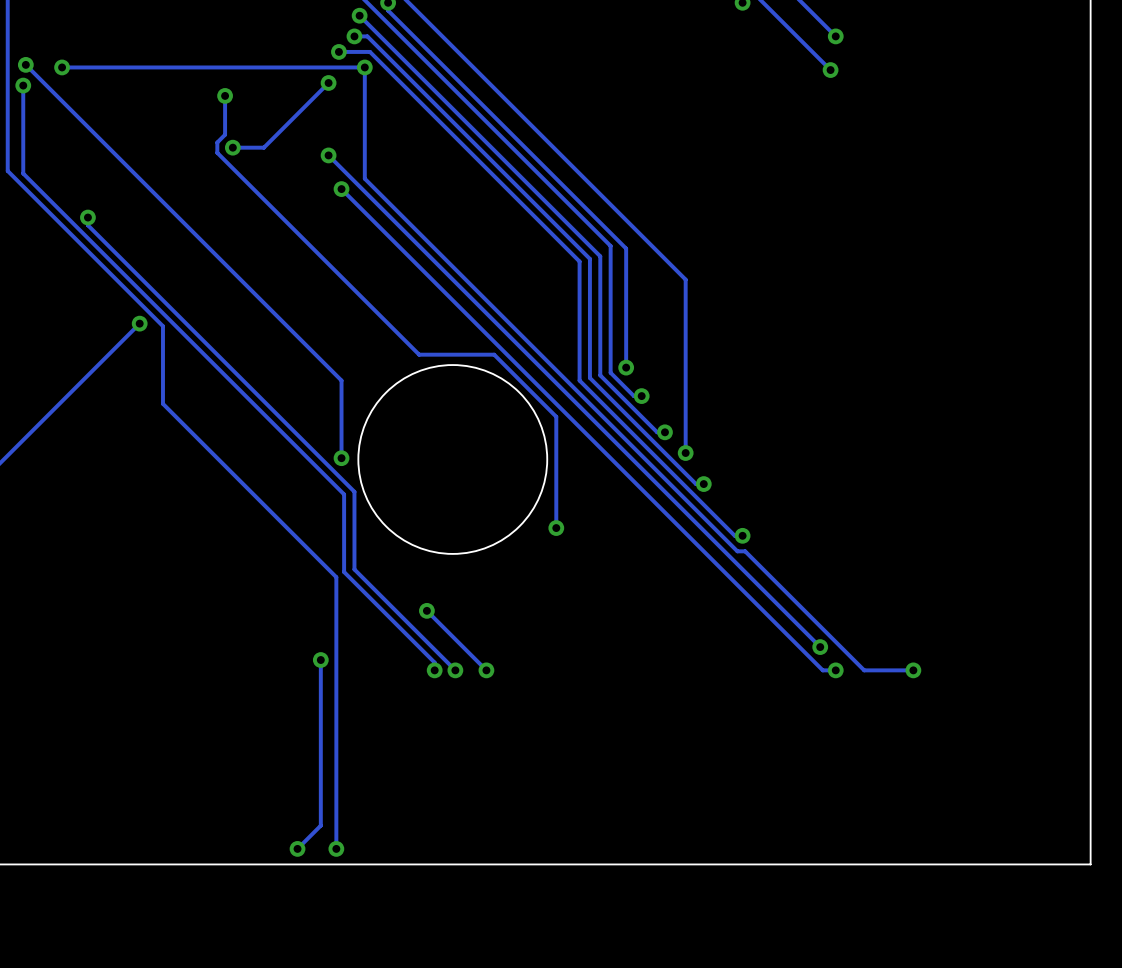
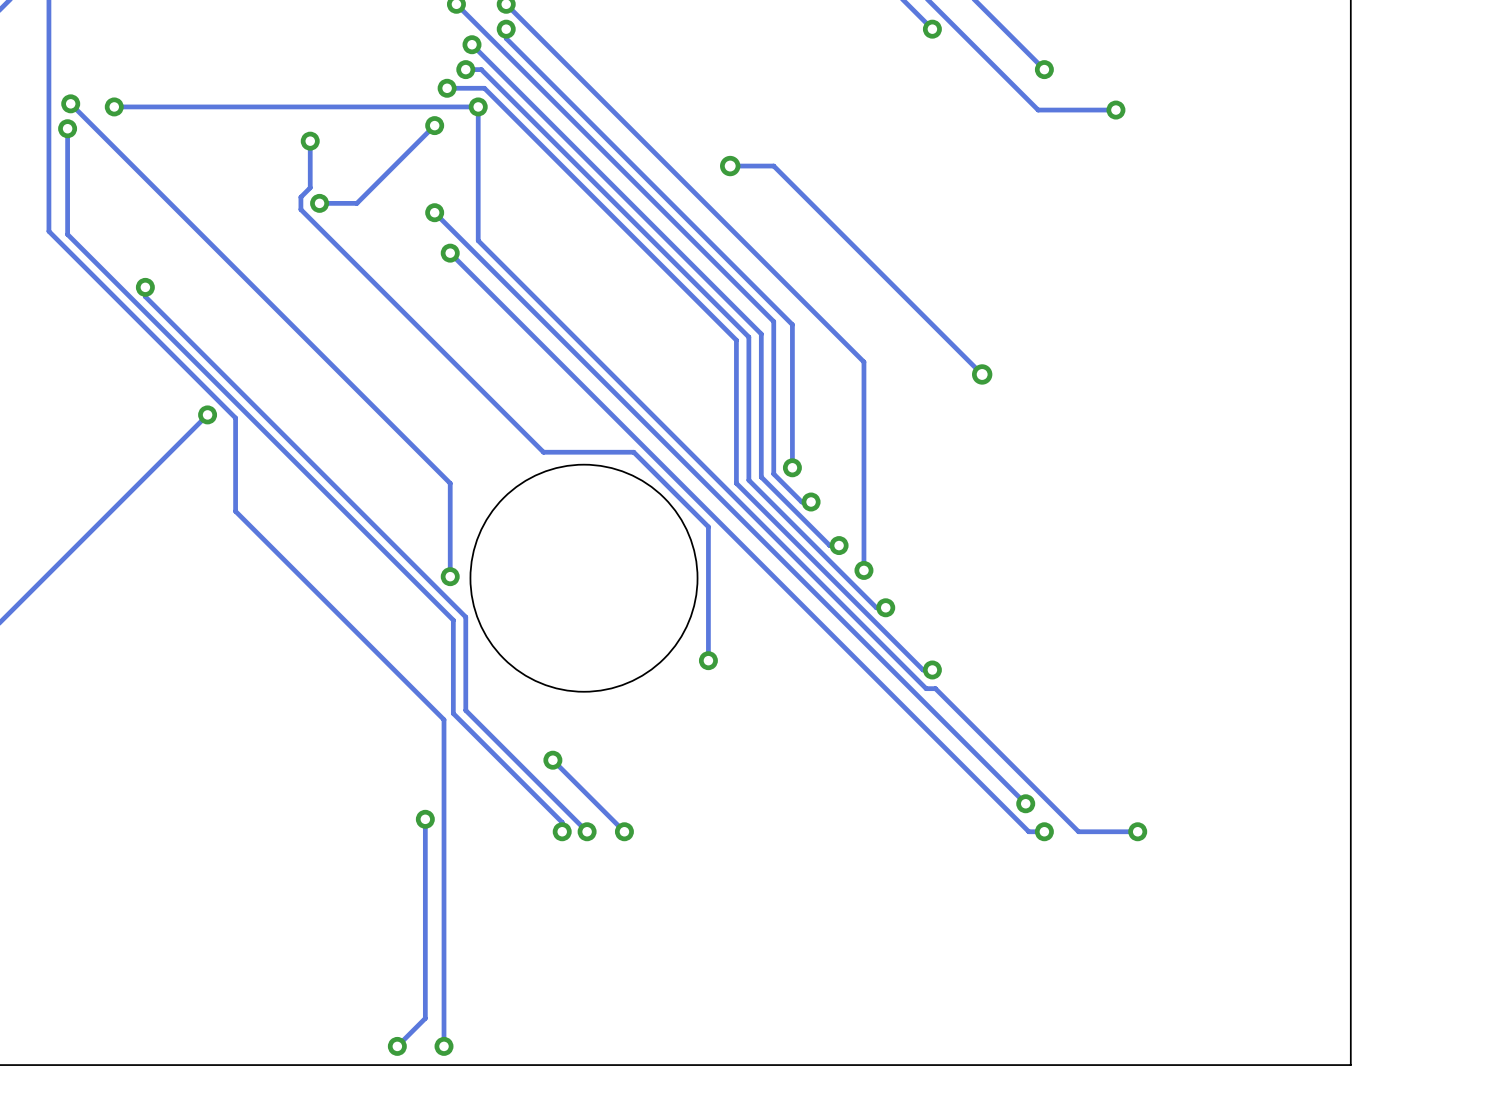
via: (830, 70) -> none
track: none -> (1115, 110) (1038, 110)
via: none -> (1115, 110)
track: none -> (730, 166) (773, 166) (982, 374)
via: none -> (730, 166)
via: none -> (982, 374)

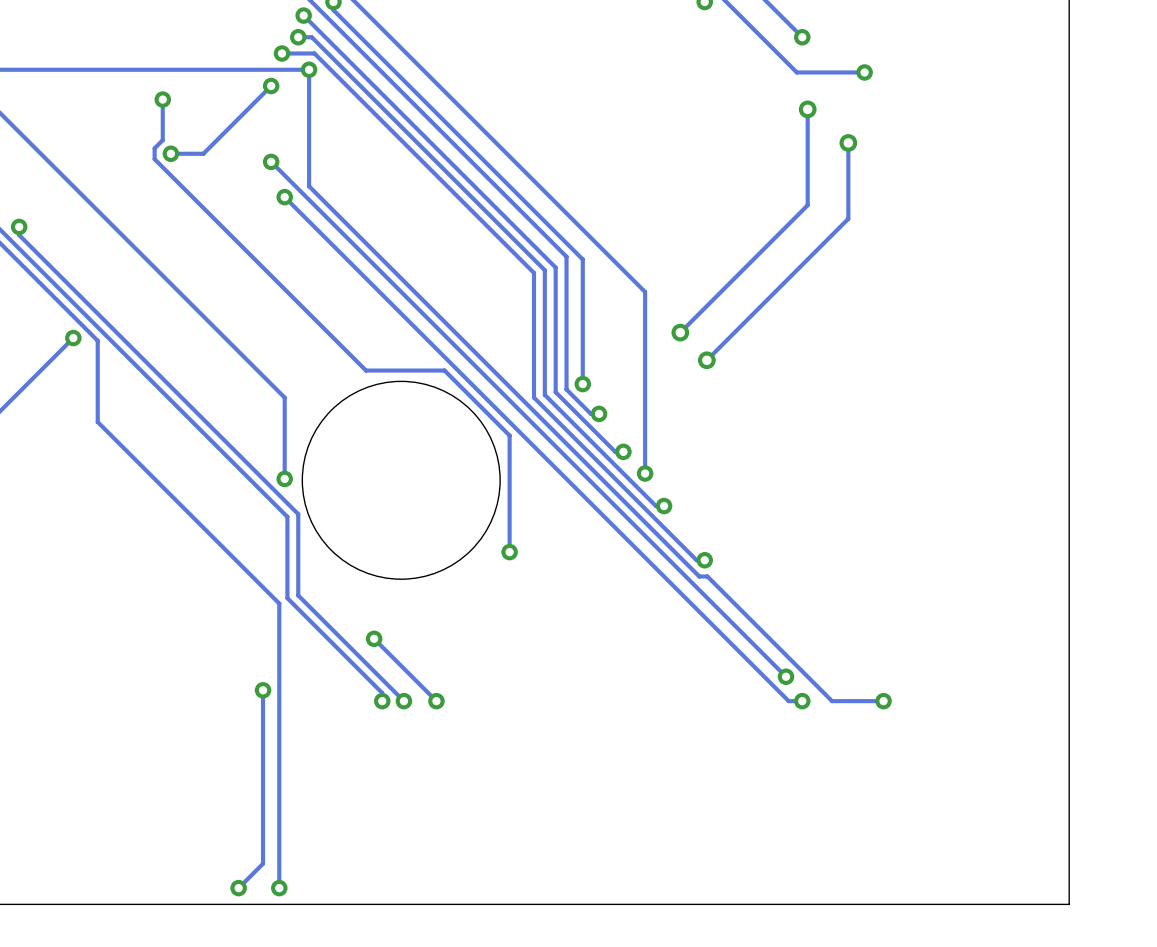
track: none -> (807, 109) (807, 205) (680, 332)
via: none -> (807, 109)
track: (730, 166) (773, 166) (982, 374) -> none
via: (730, 166) -> none
track: none -> (848, 142) (848, 218) (706, 360)
via: none -> (848, 142)
via: (982, 374) -> none
via: none -> (680, 332)
via: none -> (706, 360)

